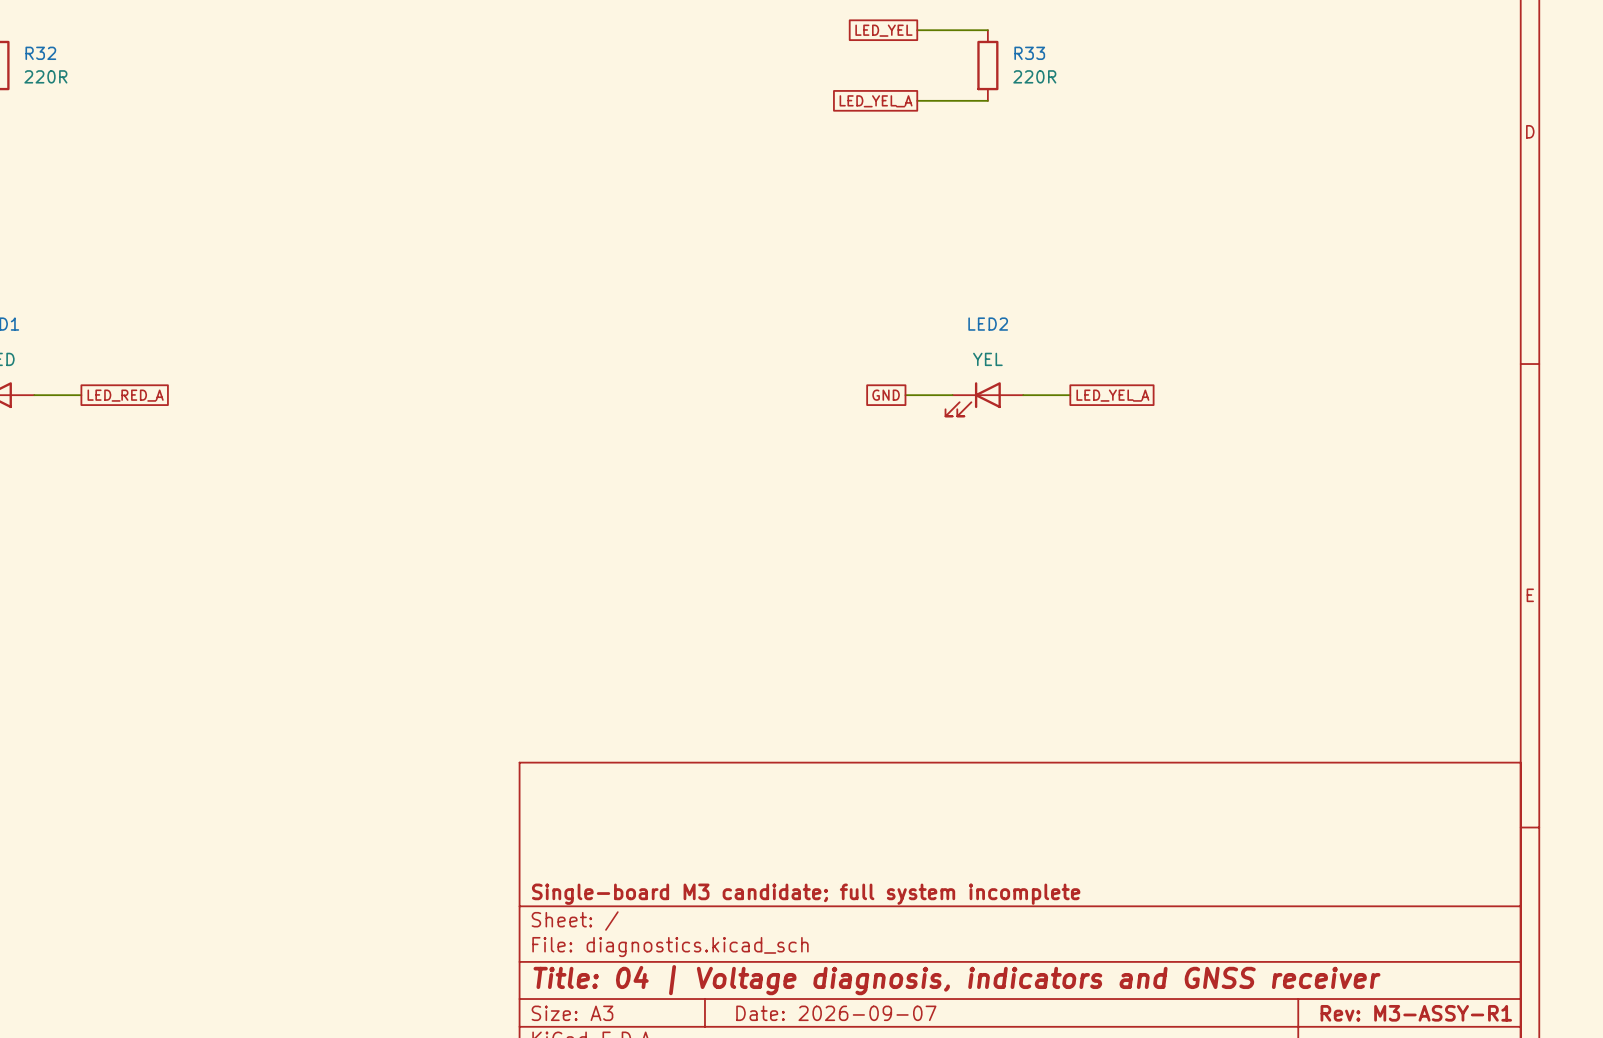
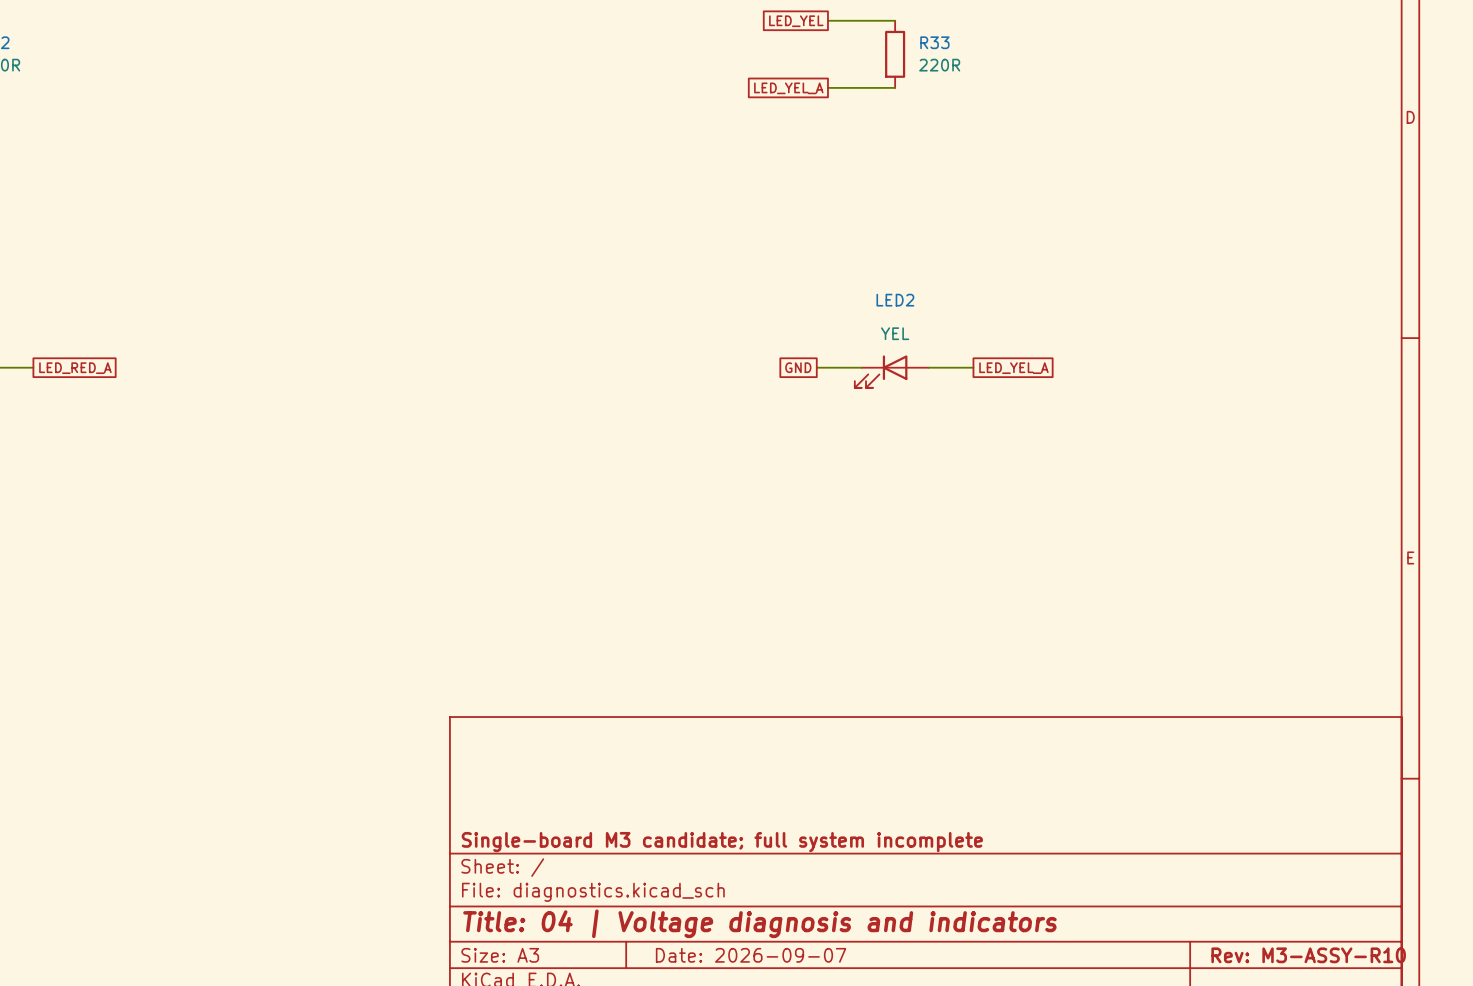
title block: Title: 04 | Voltage diagnosis, indicators and GNSS receiver (956, 980) -> Title: 04 | Voltage diagnosis and indicators (759, 923)
title block: Rev: M3-ASSY-R1 (1416, 1013) -> Rev: M3-ASSY-R10 (1308, 955)

